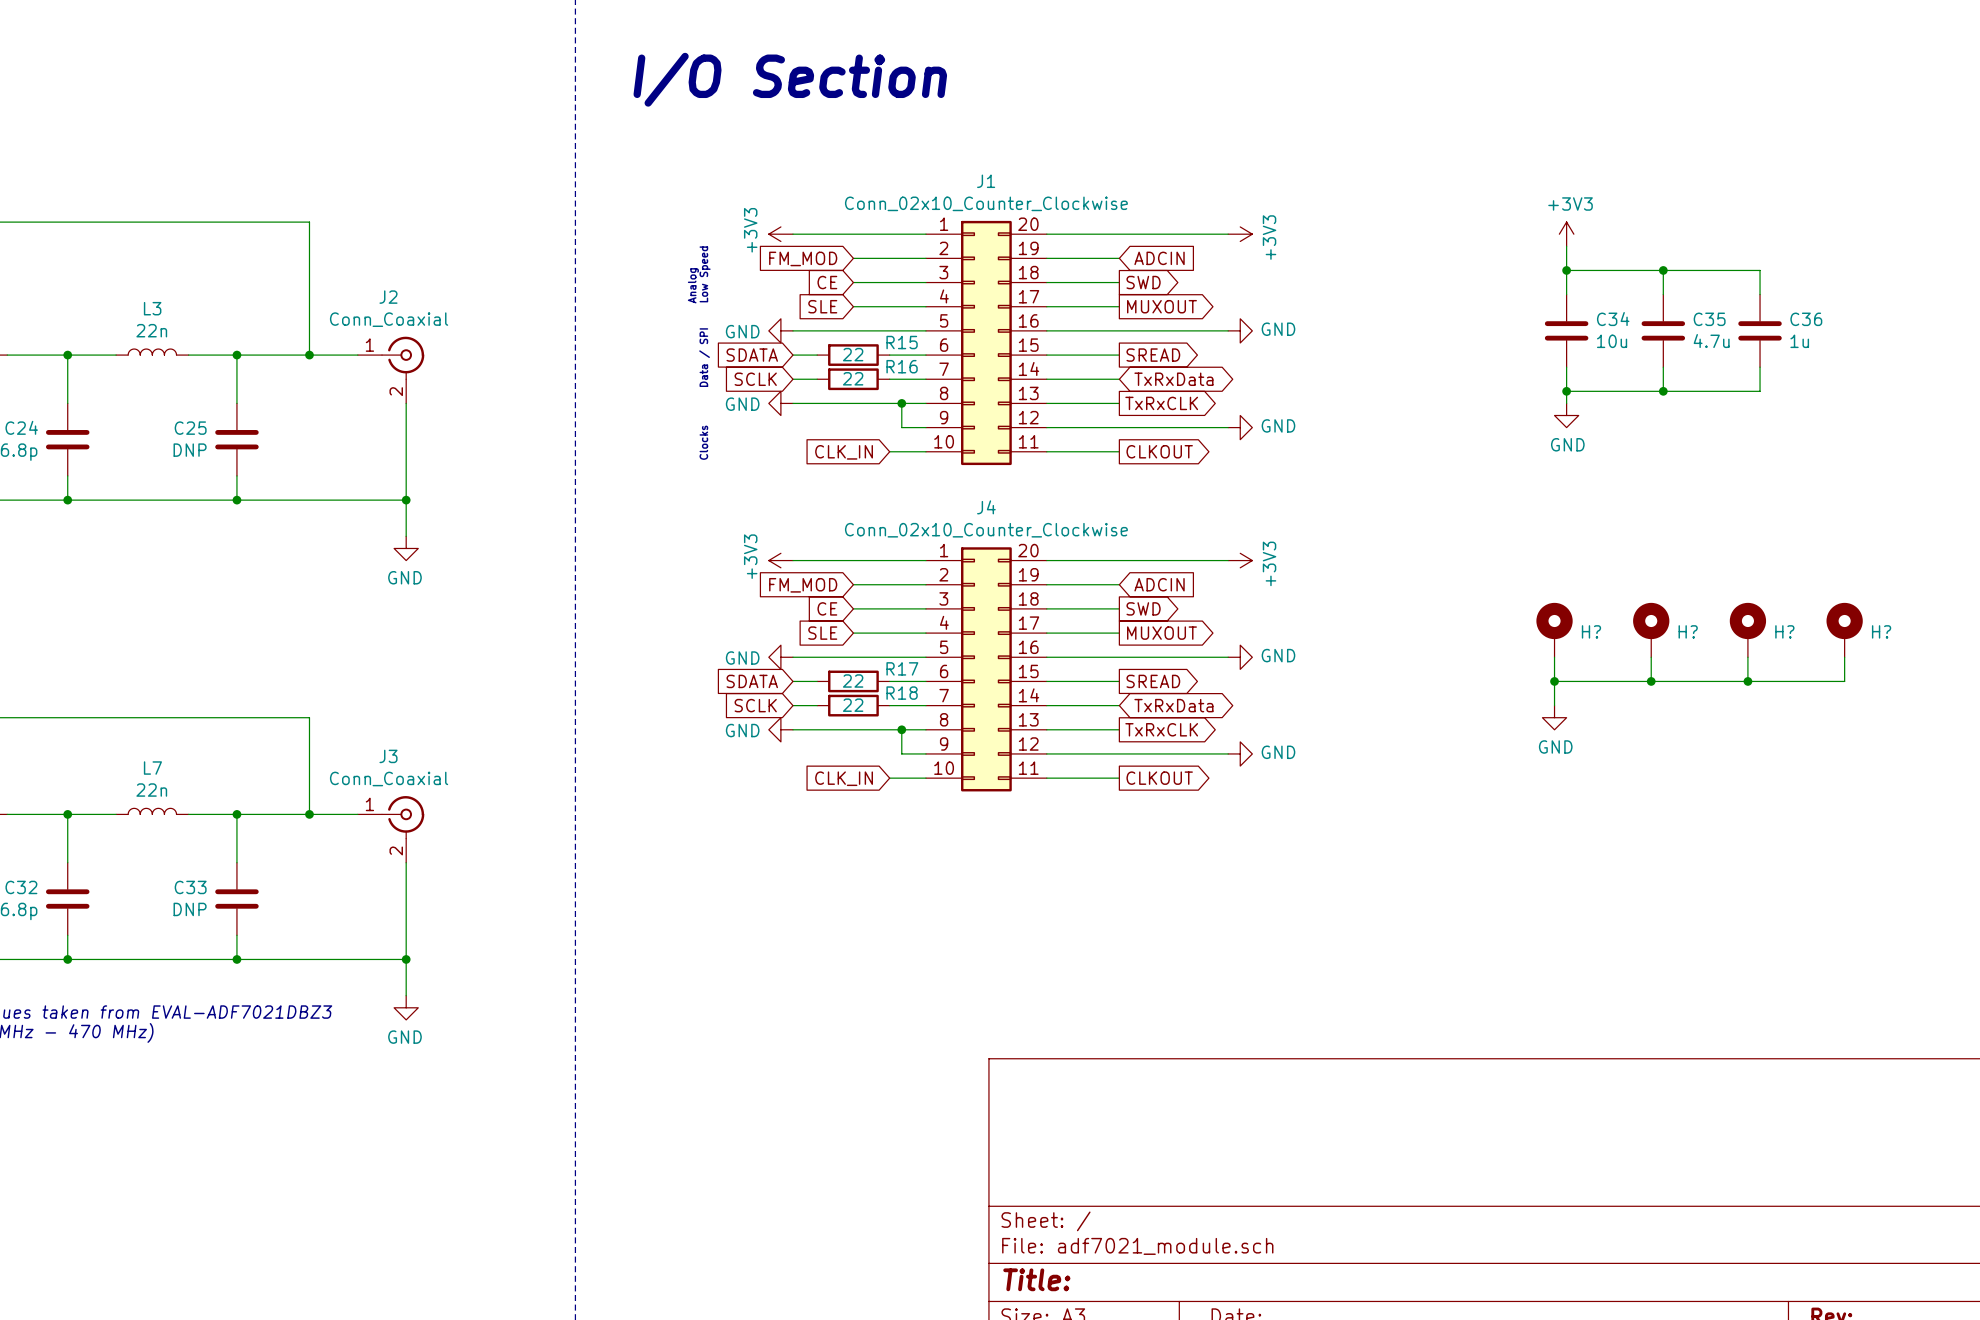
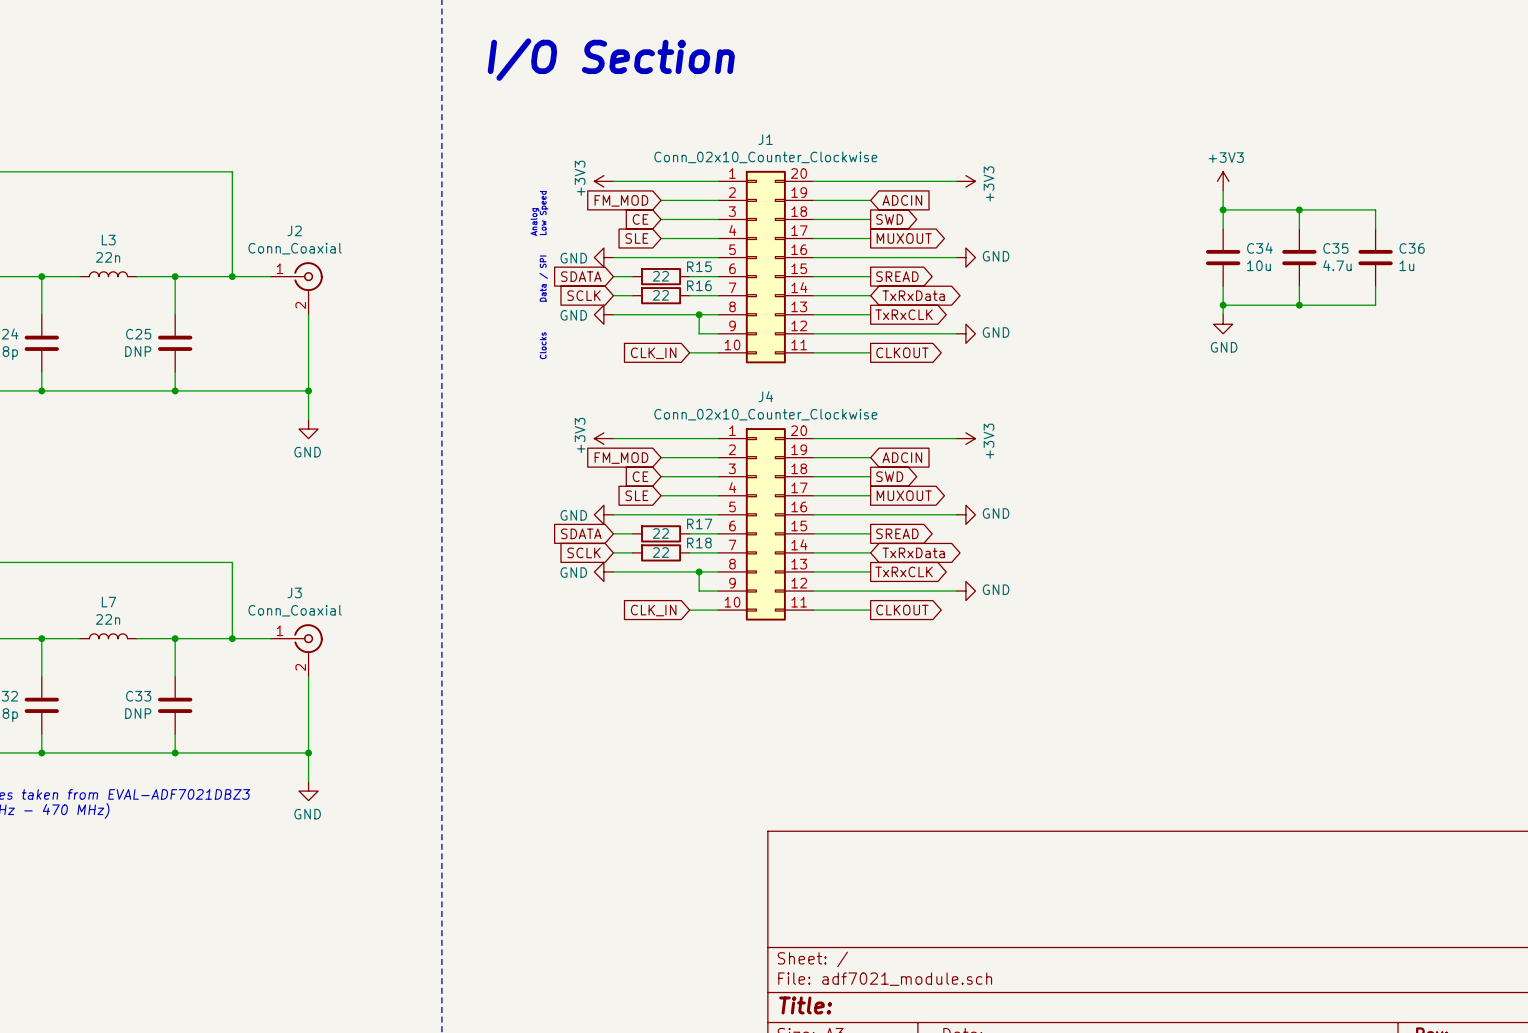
H?: (1554, 630) -> none
H?: (1651, 630) -> none
H?: (1747, 630) -> none
H?: (1844, 630) -> none
wire: (1554, 657) (1554, 705) -> none
wire: (1651, 657) (1651, 681) -> none
wire: (1747, 657) (1747, 681) -> none
wire: (1844, 657) (1844, 681) (1554, 681) -> none
junction: (1554, 681) -> none
junction: (1651, 681) -> none
junction: (1747, 681) -> none
power symbol: GND (1554, 717) -> none

